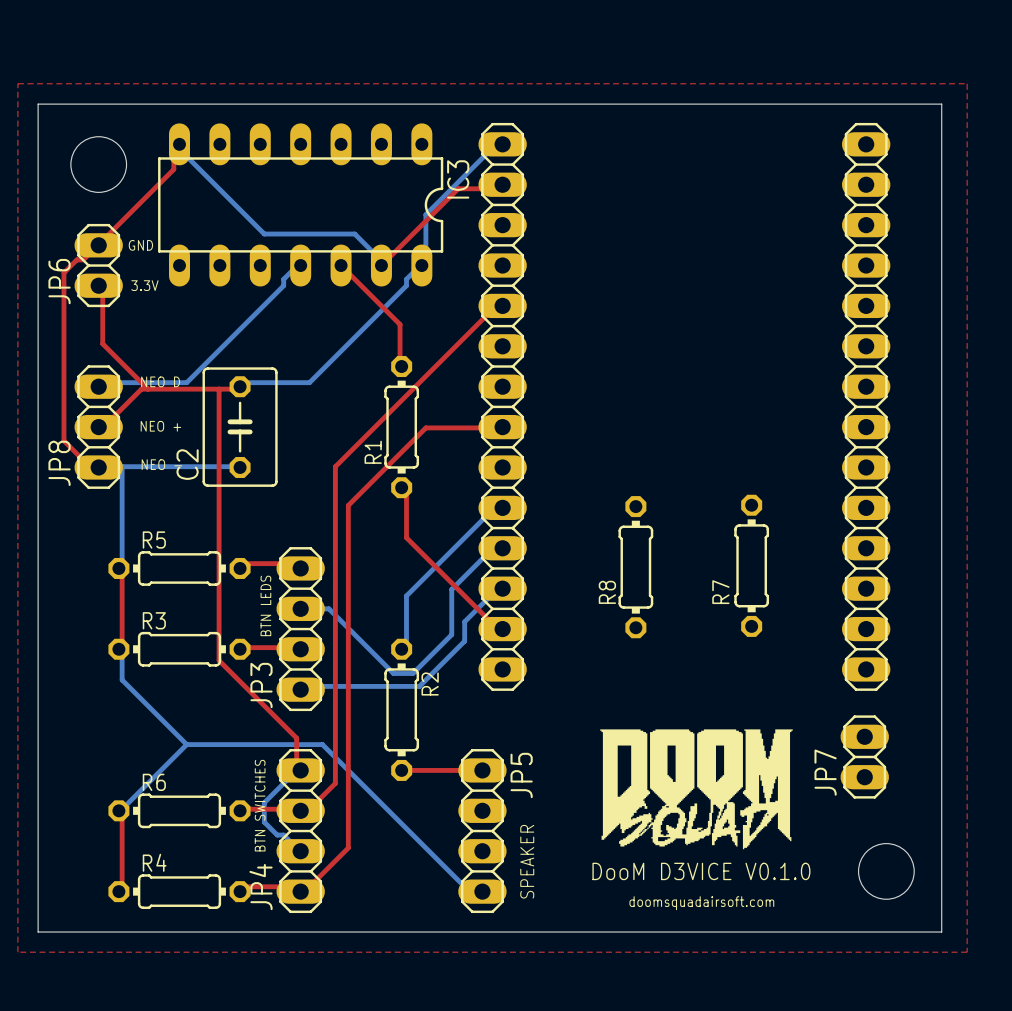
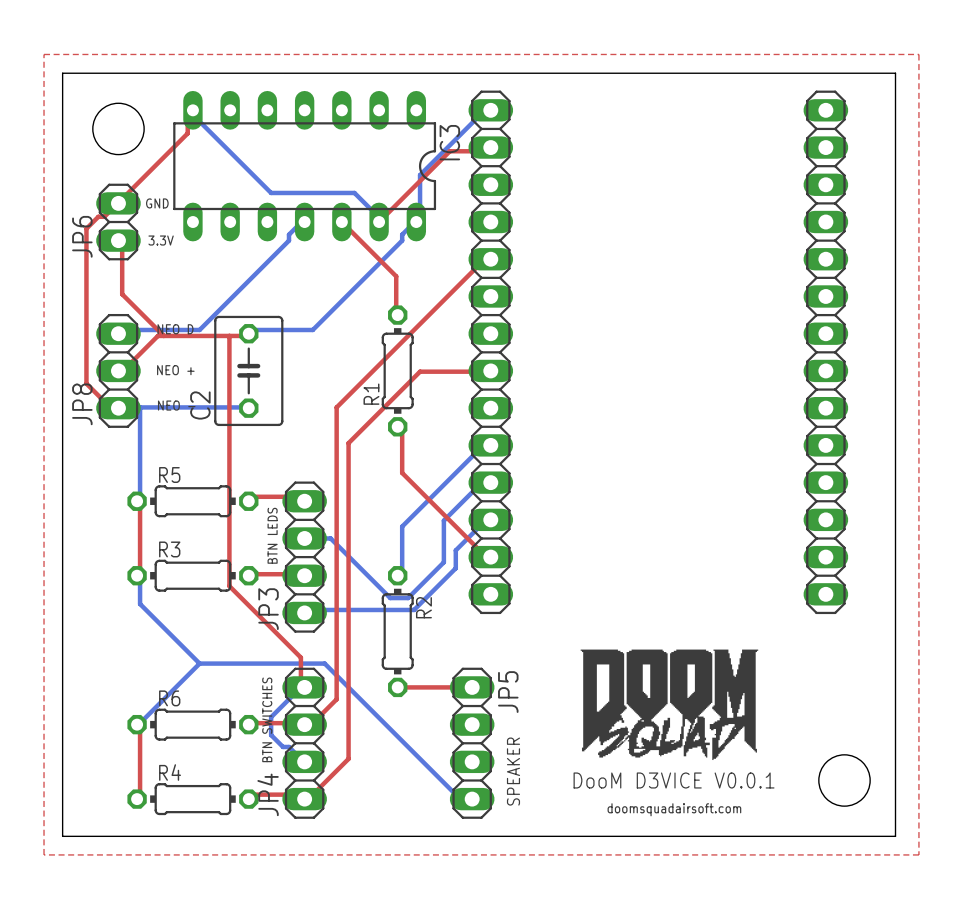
R7: (751, 565) -> none
R8: (635, 567) -> none
JP7: (864, 756) -> none
text: DooM D3VICE V0.1.0 (701, 871) -> DooM D3VICE V0.0.1 (674, 780)

